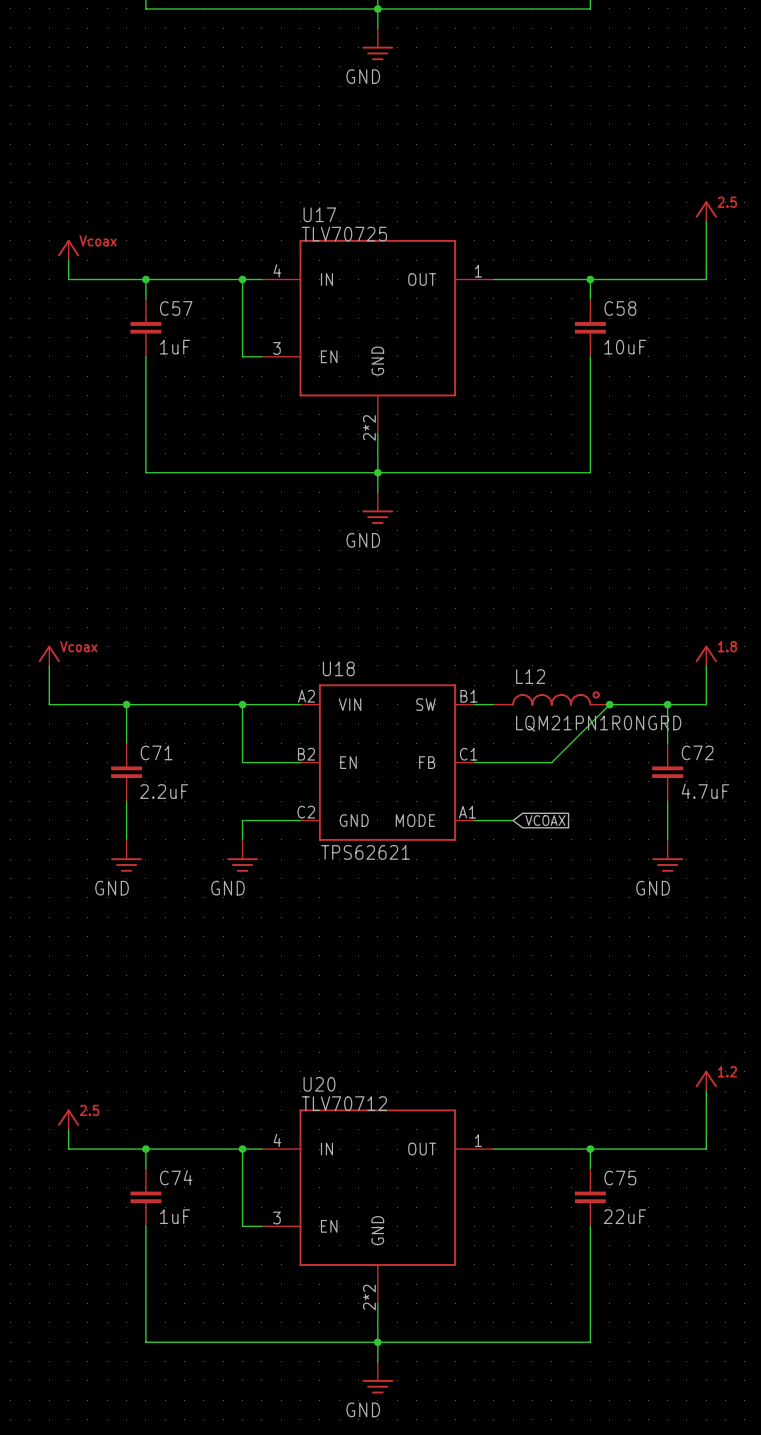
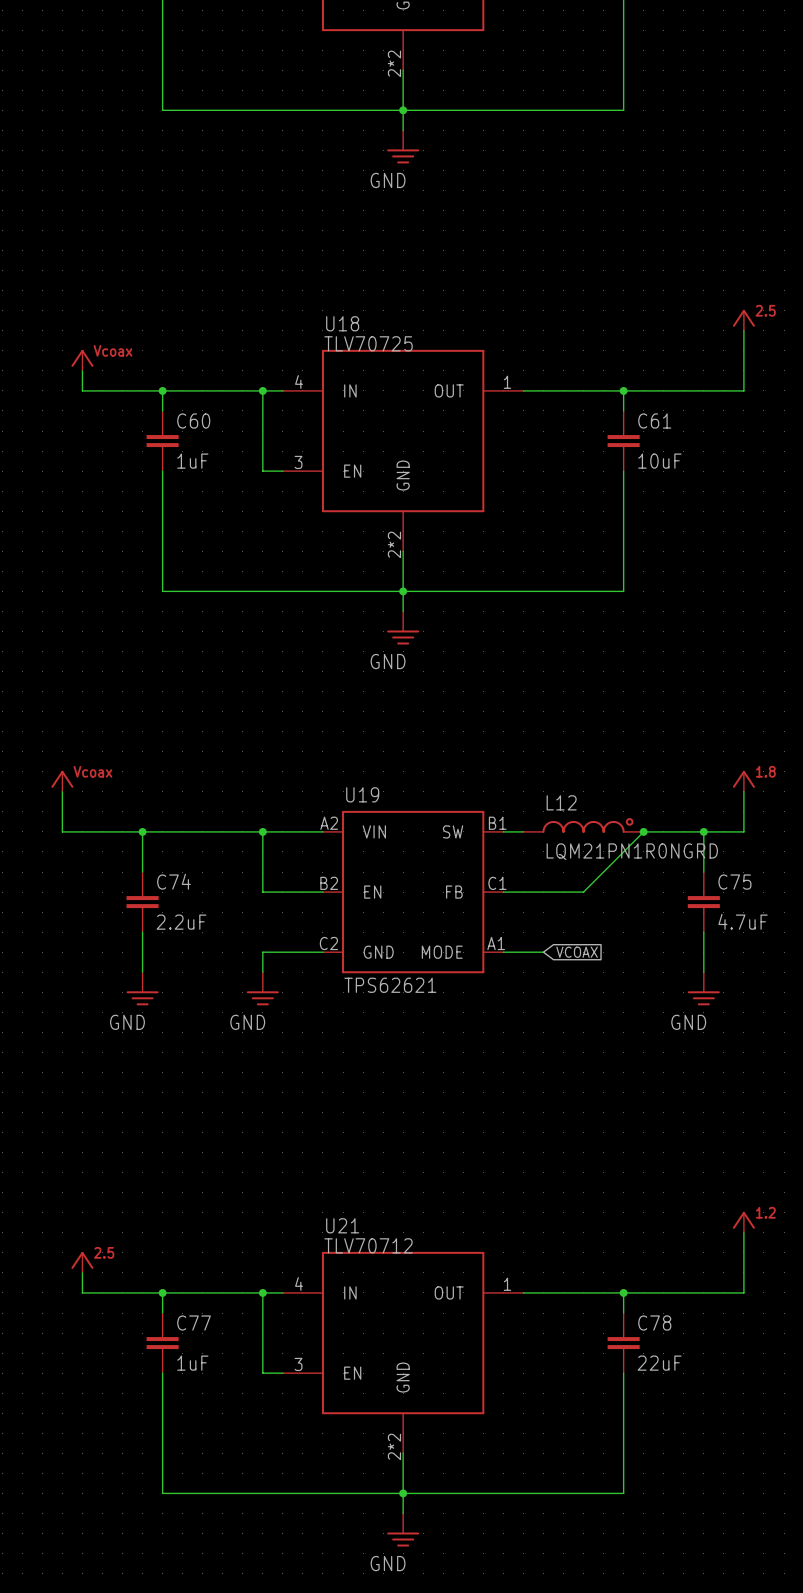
U17 name: U17 (319, 214) -> U18 (342, 323)
C57 name: C57 (176, 308) -> C60 (193, 421)
C58 name: C58 (620, 308) -> C61 (654, 421)
U18 name: U18 (338, 668) -> U19 (362, 794)
C71 name: C71 (156, 752) -> C74 (173, 881)
C72 name: C72 (697, 752) -> C75 (734, 882)
U20 name: U20 (319, 1084) -> U21 (342, 1225)
C74 name: C74 (176, 1177) -> C77 (194, 1323)
C75 name: C75 (620, 1178) -> C78 (654, 1323)

